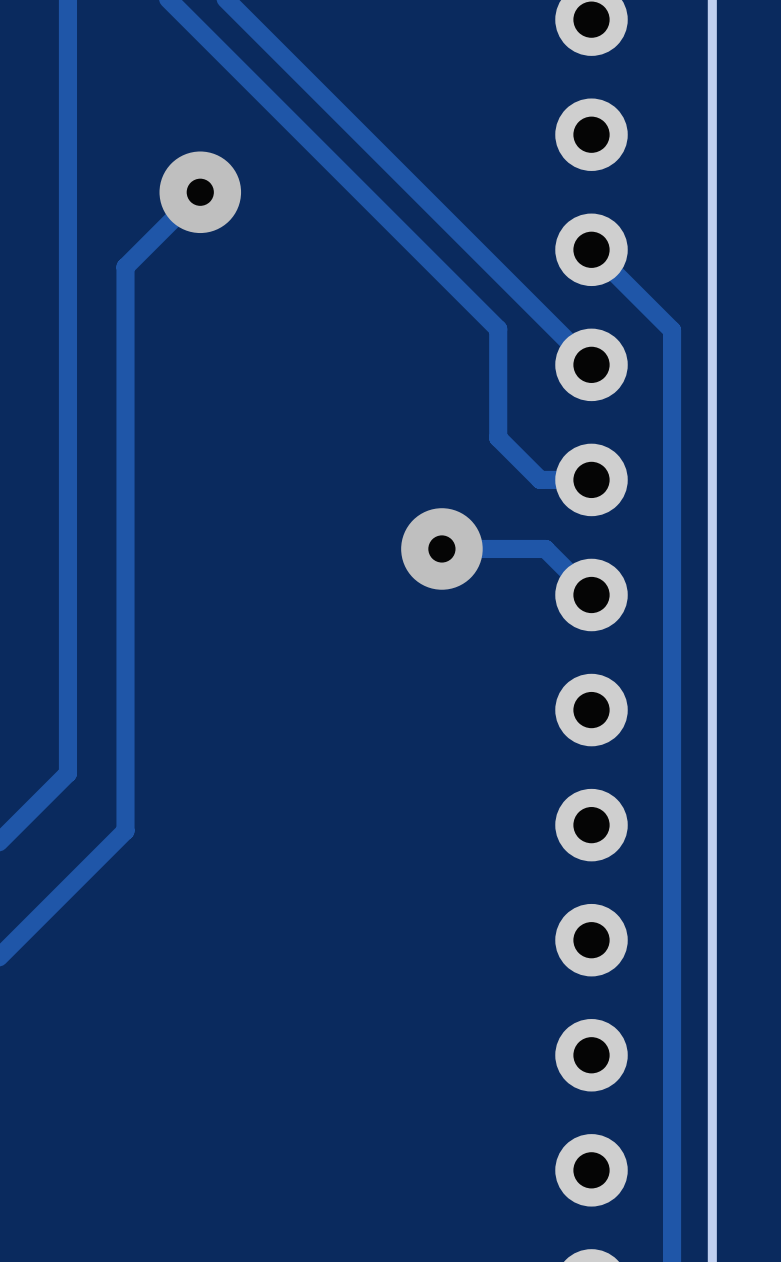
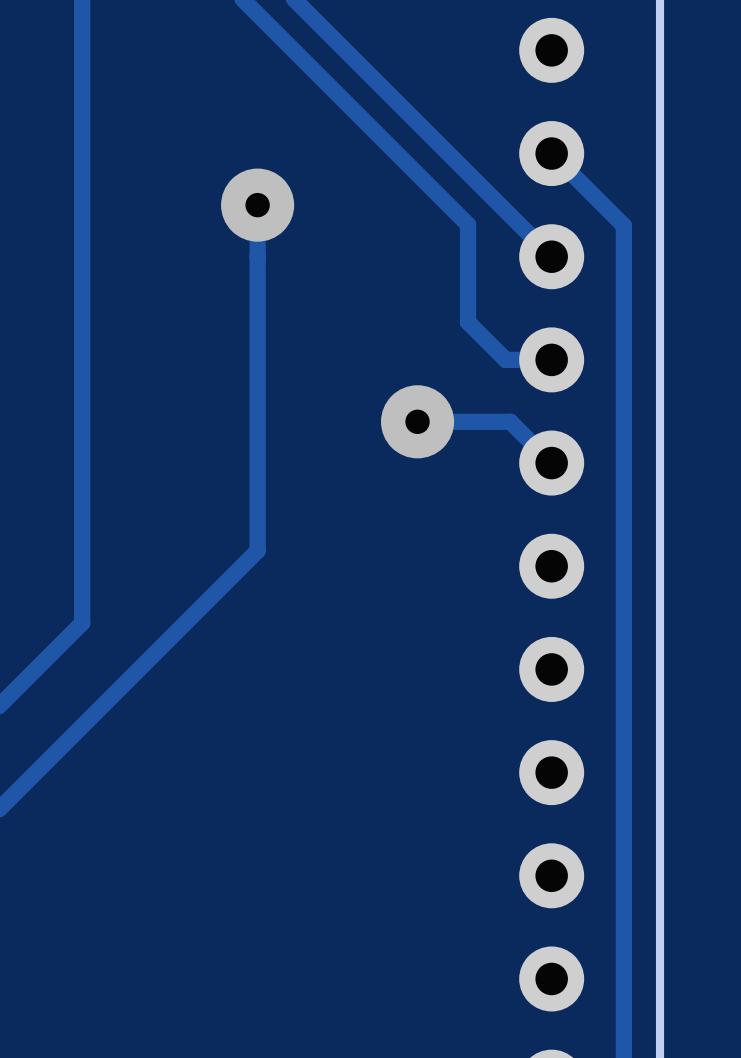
track: (200, 192) (125, 267) (125, 830) -> (257, 205) (257, 550) (133, 674)
via position: (200, 192) -> (257, 205)

